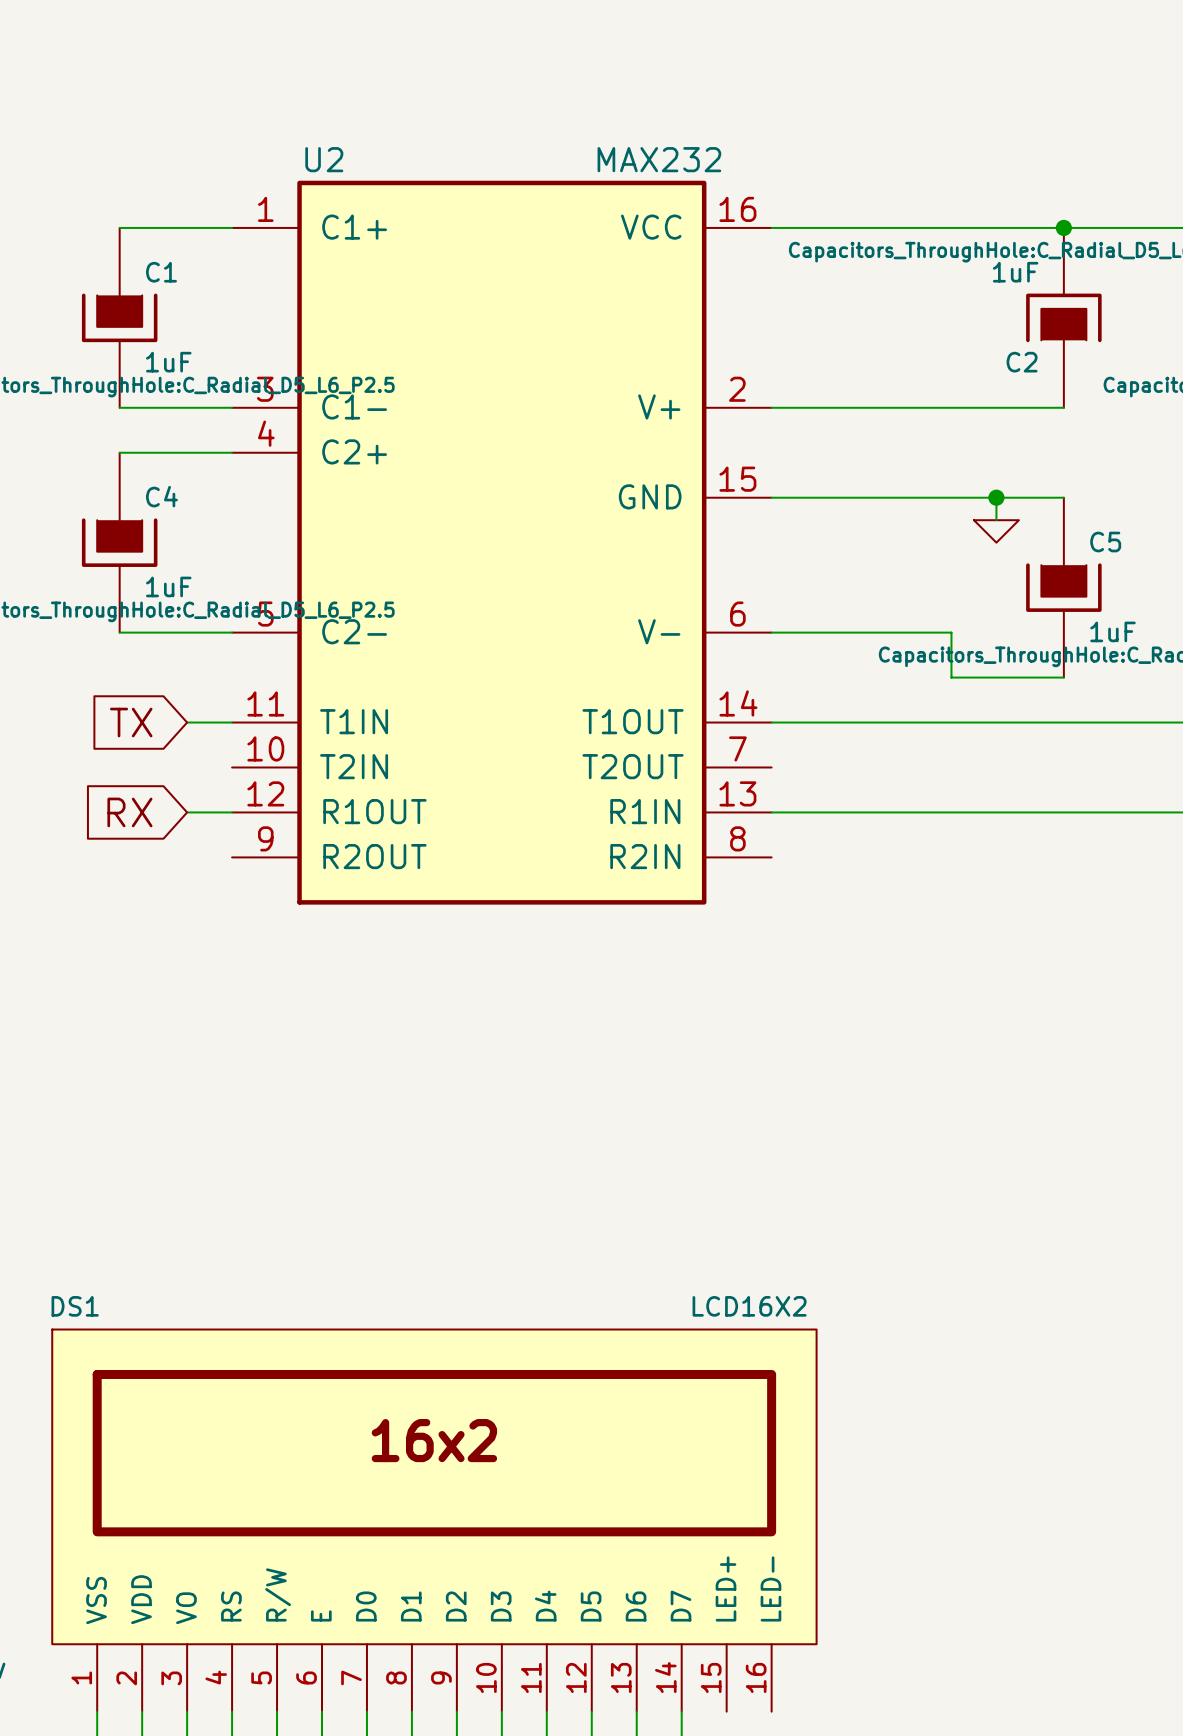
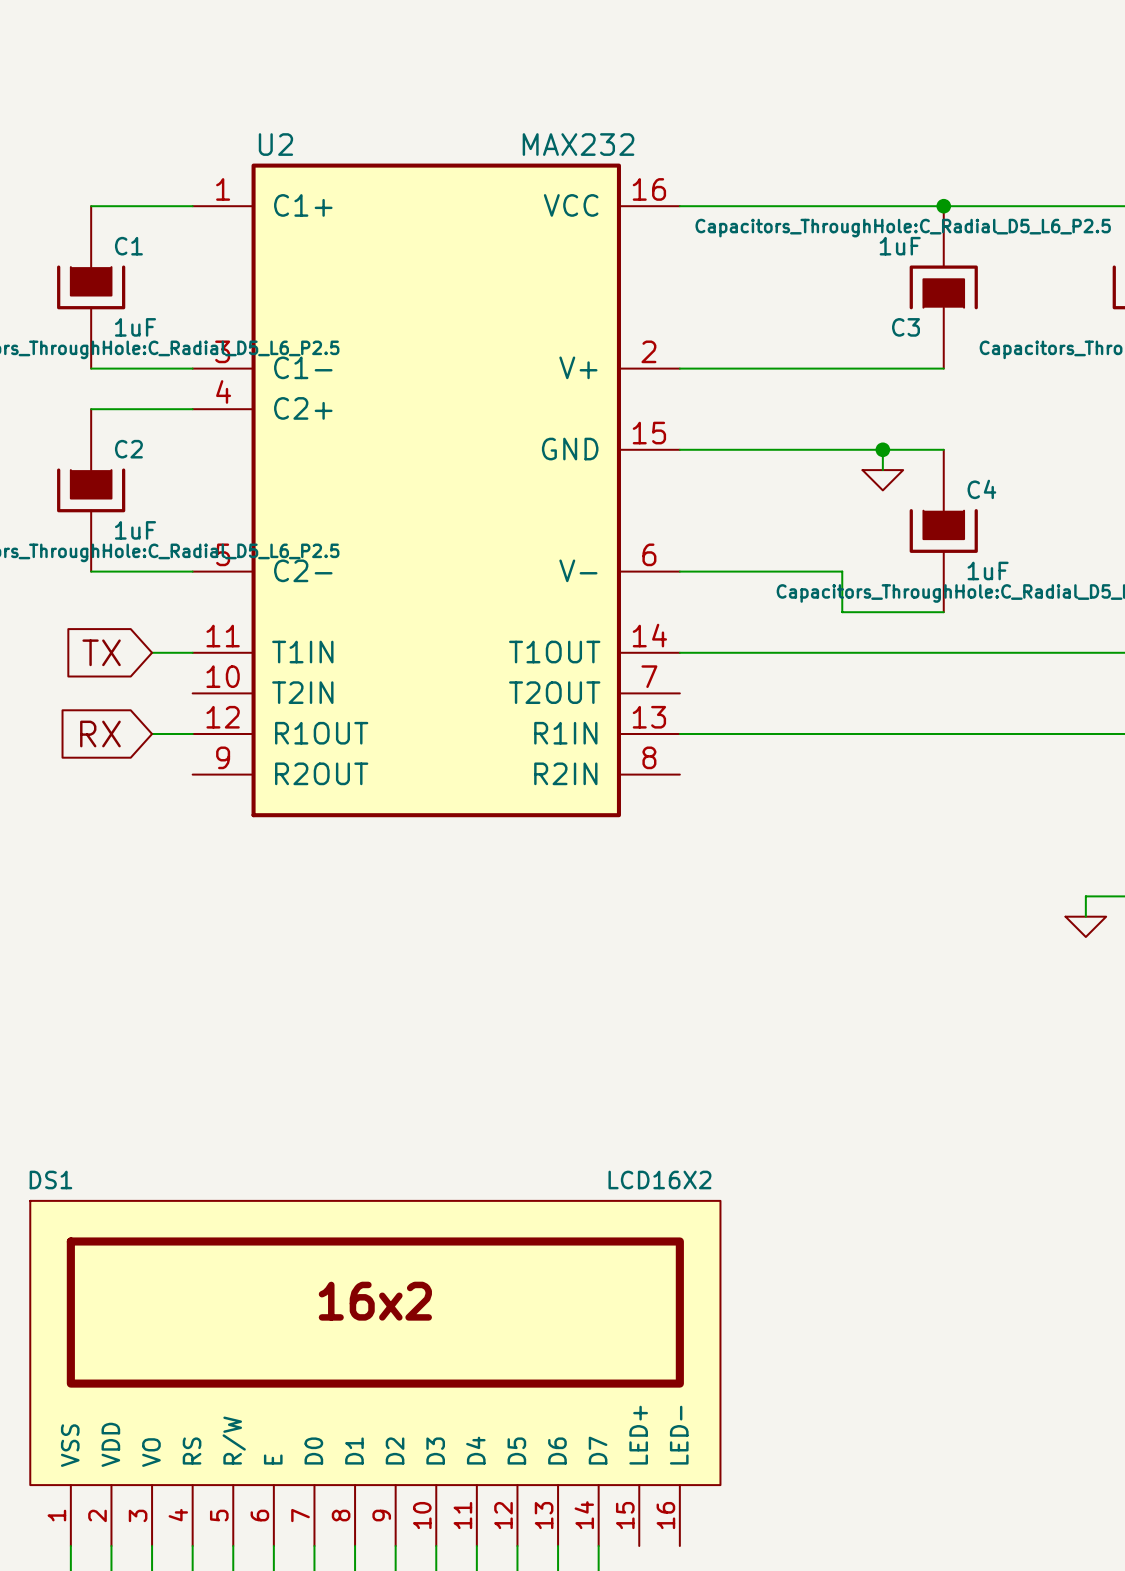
C2 name: C2 (1022, 362) -> C3 (906, 327)
C4 name: C4 (161, 496) -> C2 (128, 449)
C5 name: C5 (1105, 542) -> C4 (981, 489)

